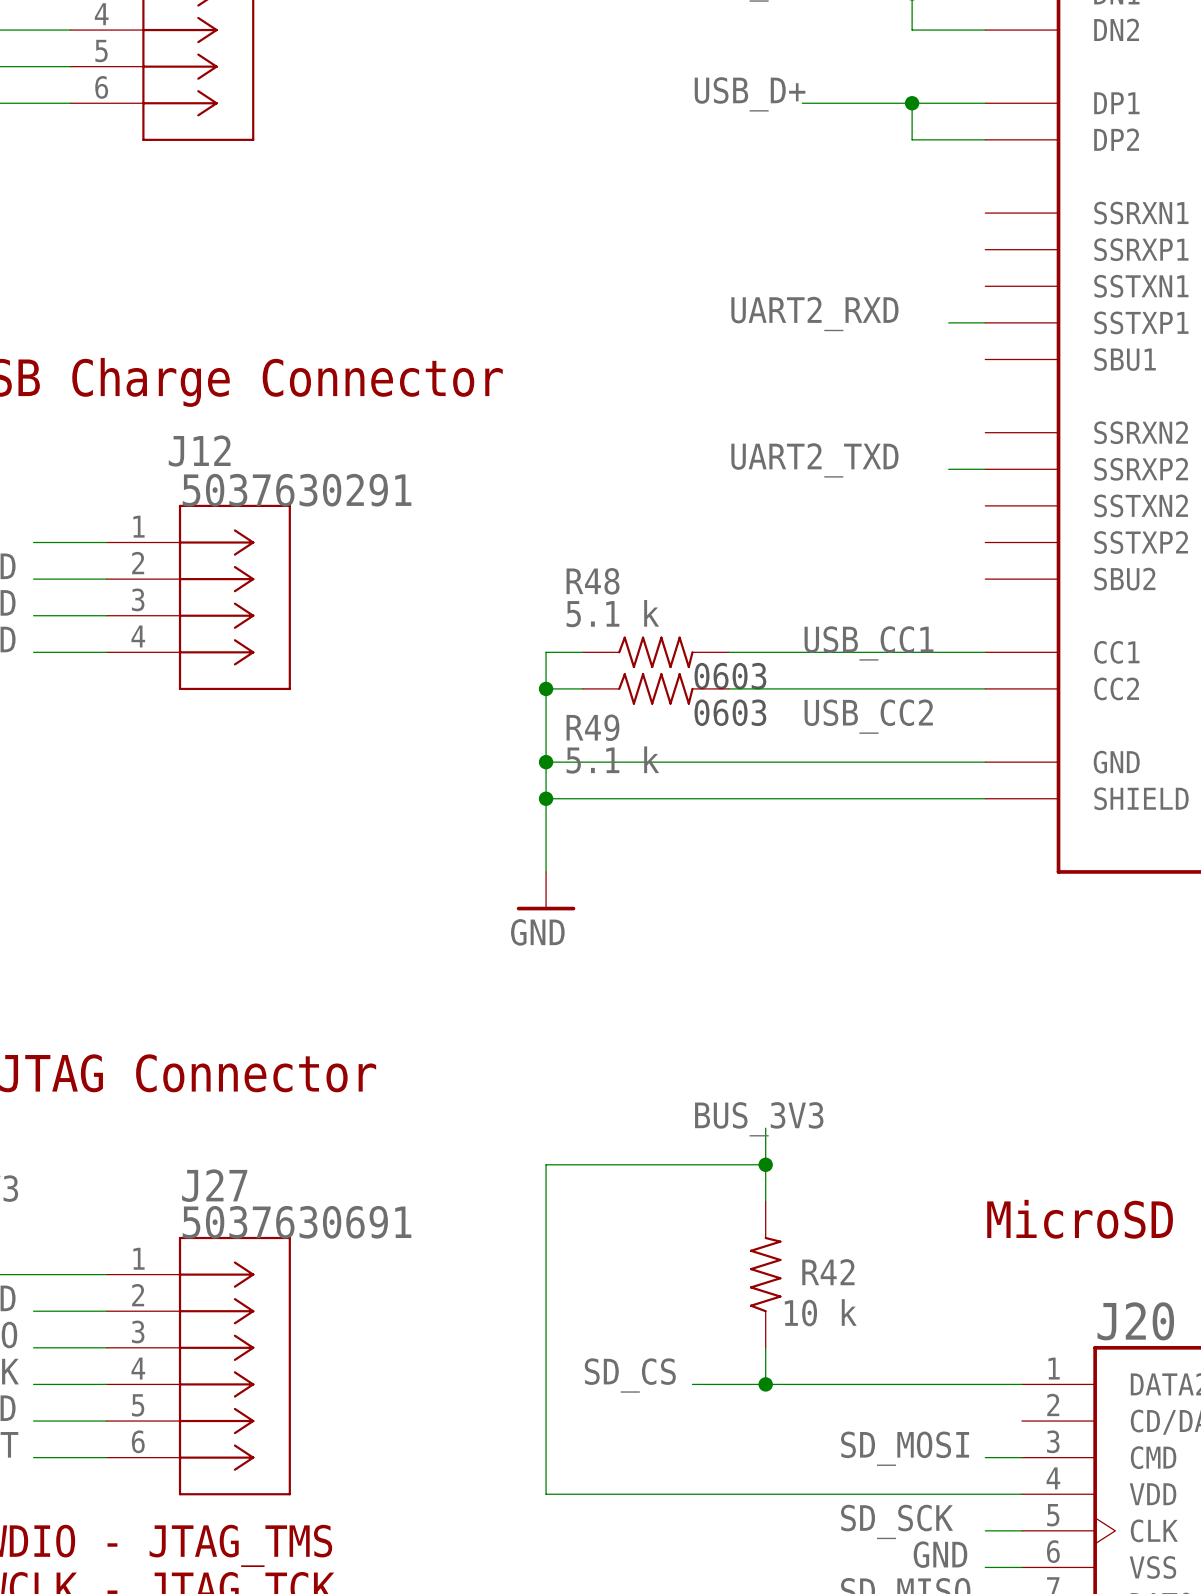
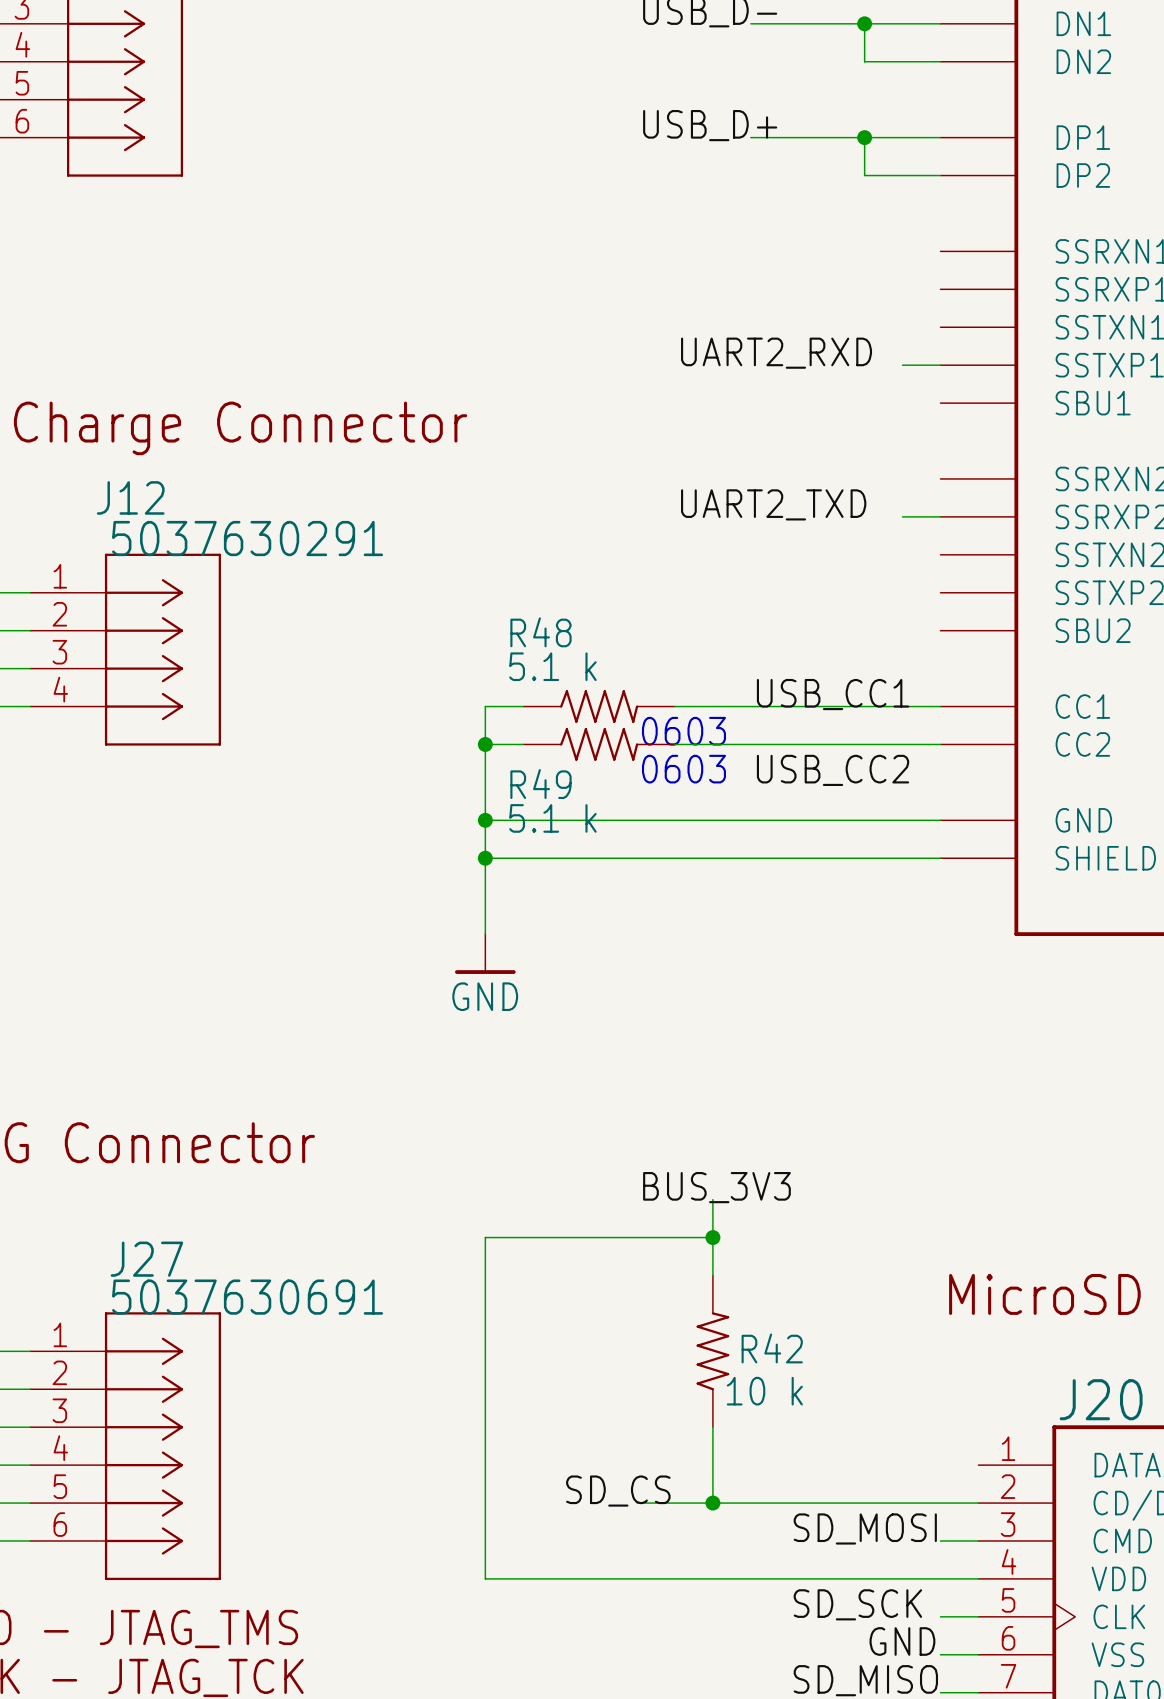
label position: SD_CS (630, 1375) -> SD_CS (618, 1491)
wire: (692, 1384) (1021, 1384) -> (637, 1503) (978, 1503)
wire: none -> (712, 1465) (712, 1503)
junction position: (765, 1384) -> (712, 1503)

